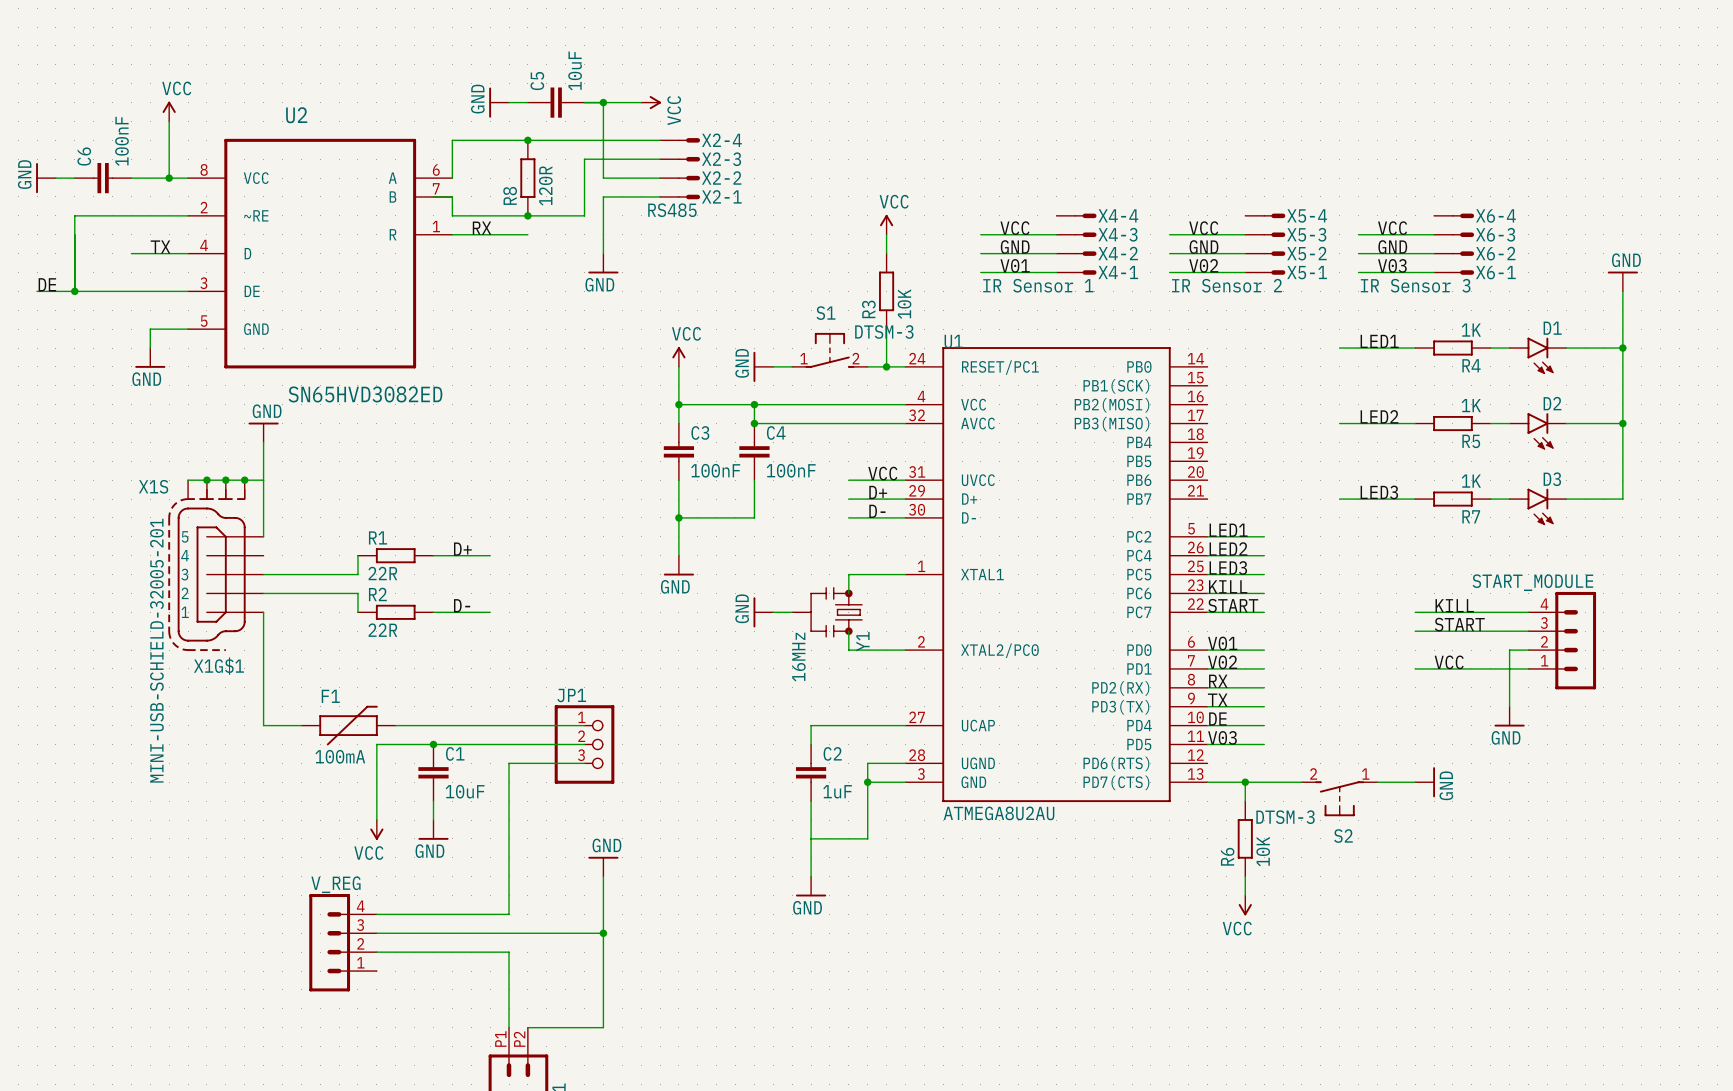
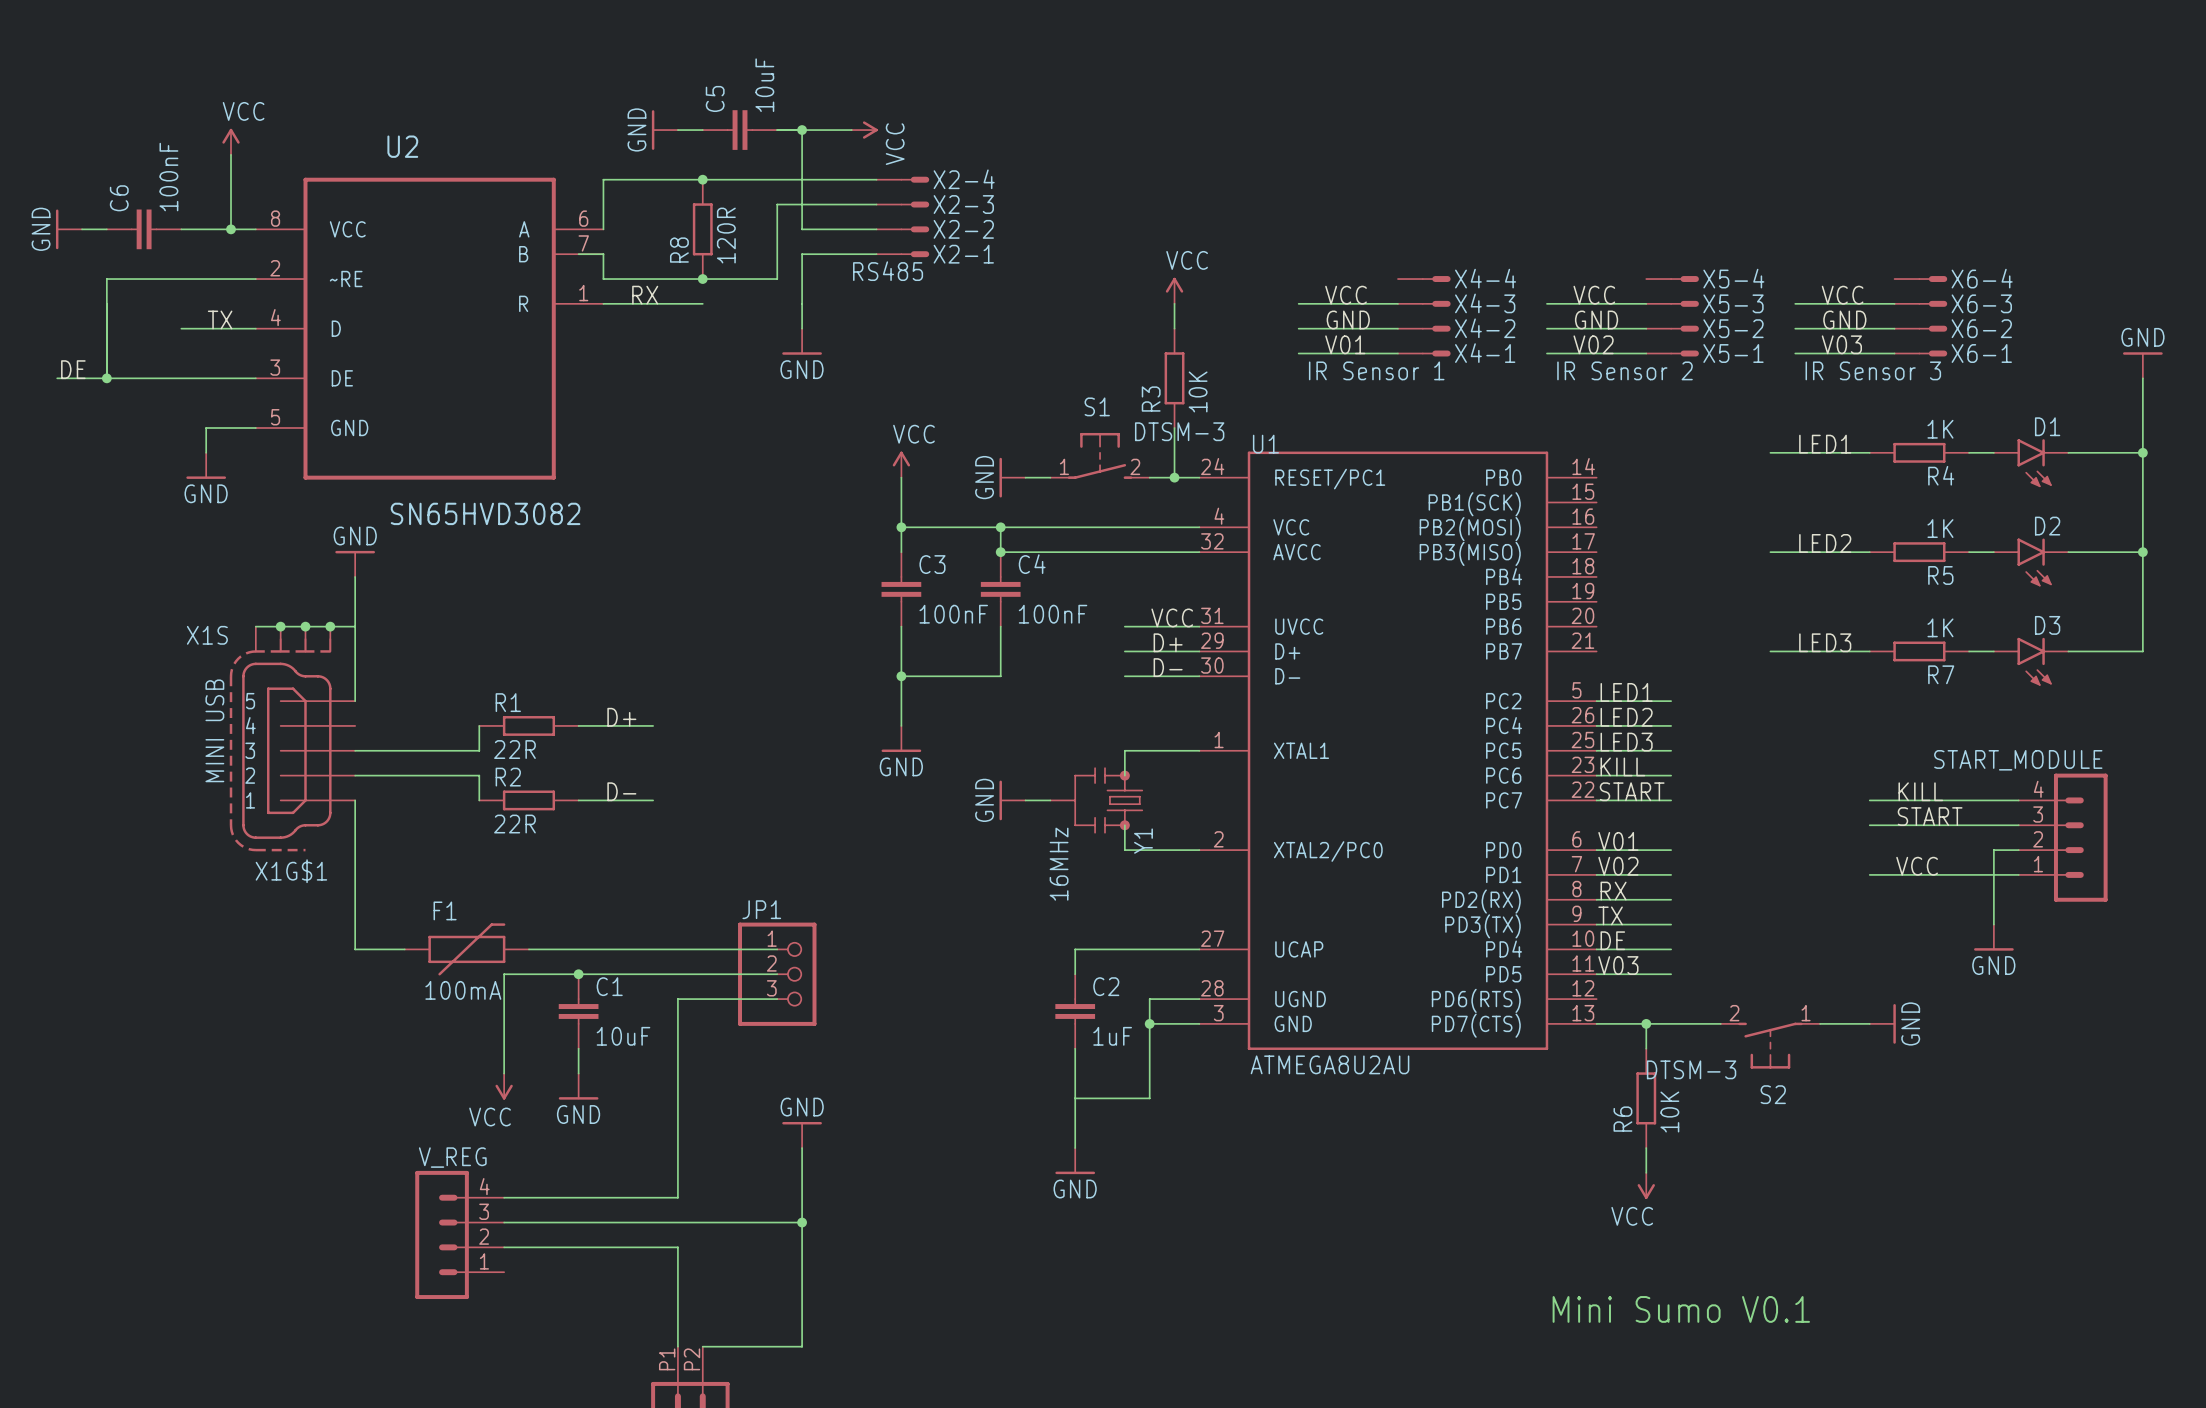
U2 value: SN65HVD3082ED (365, 394) -> SN65HVD3082 (485, 513)
X1G$1 value: MINI-USB-SCHIELD-32005-201 (156, 650) -> MINI USB (214, 730)
text: none -> Mini Sumo V0.1 (1681, 1309)

